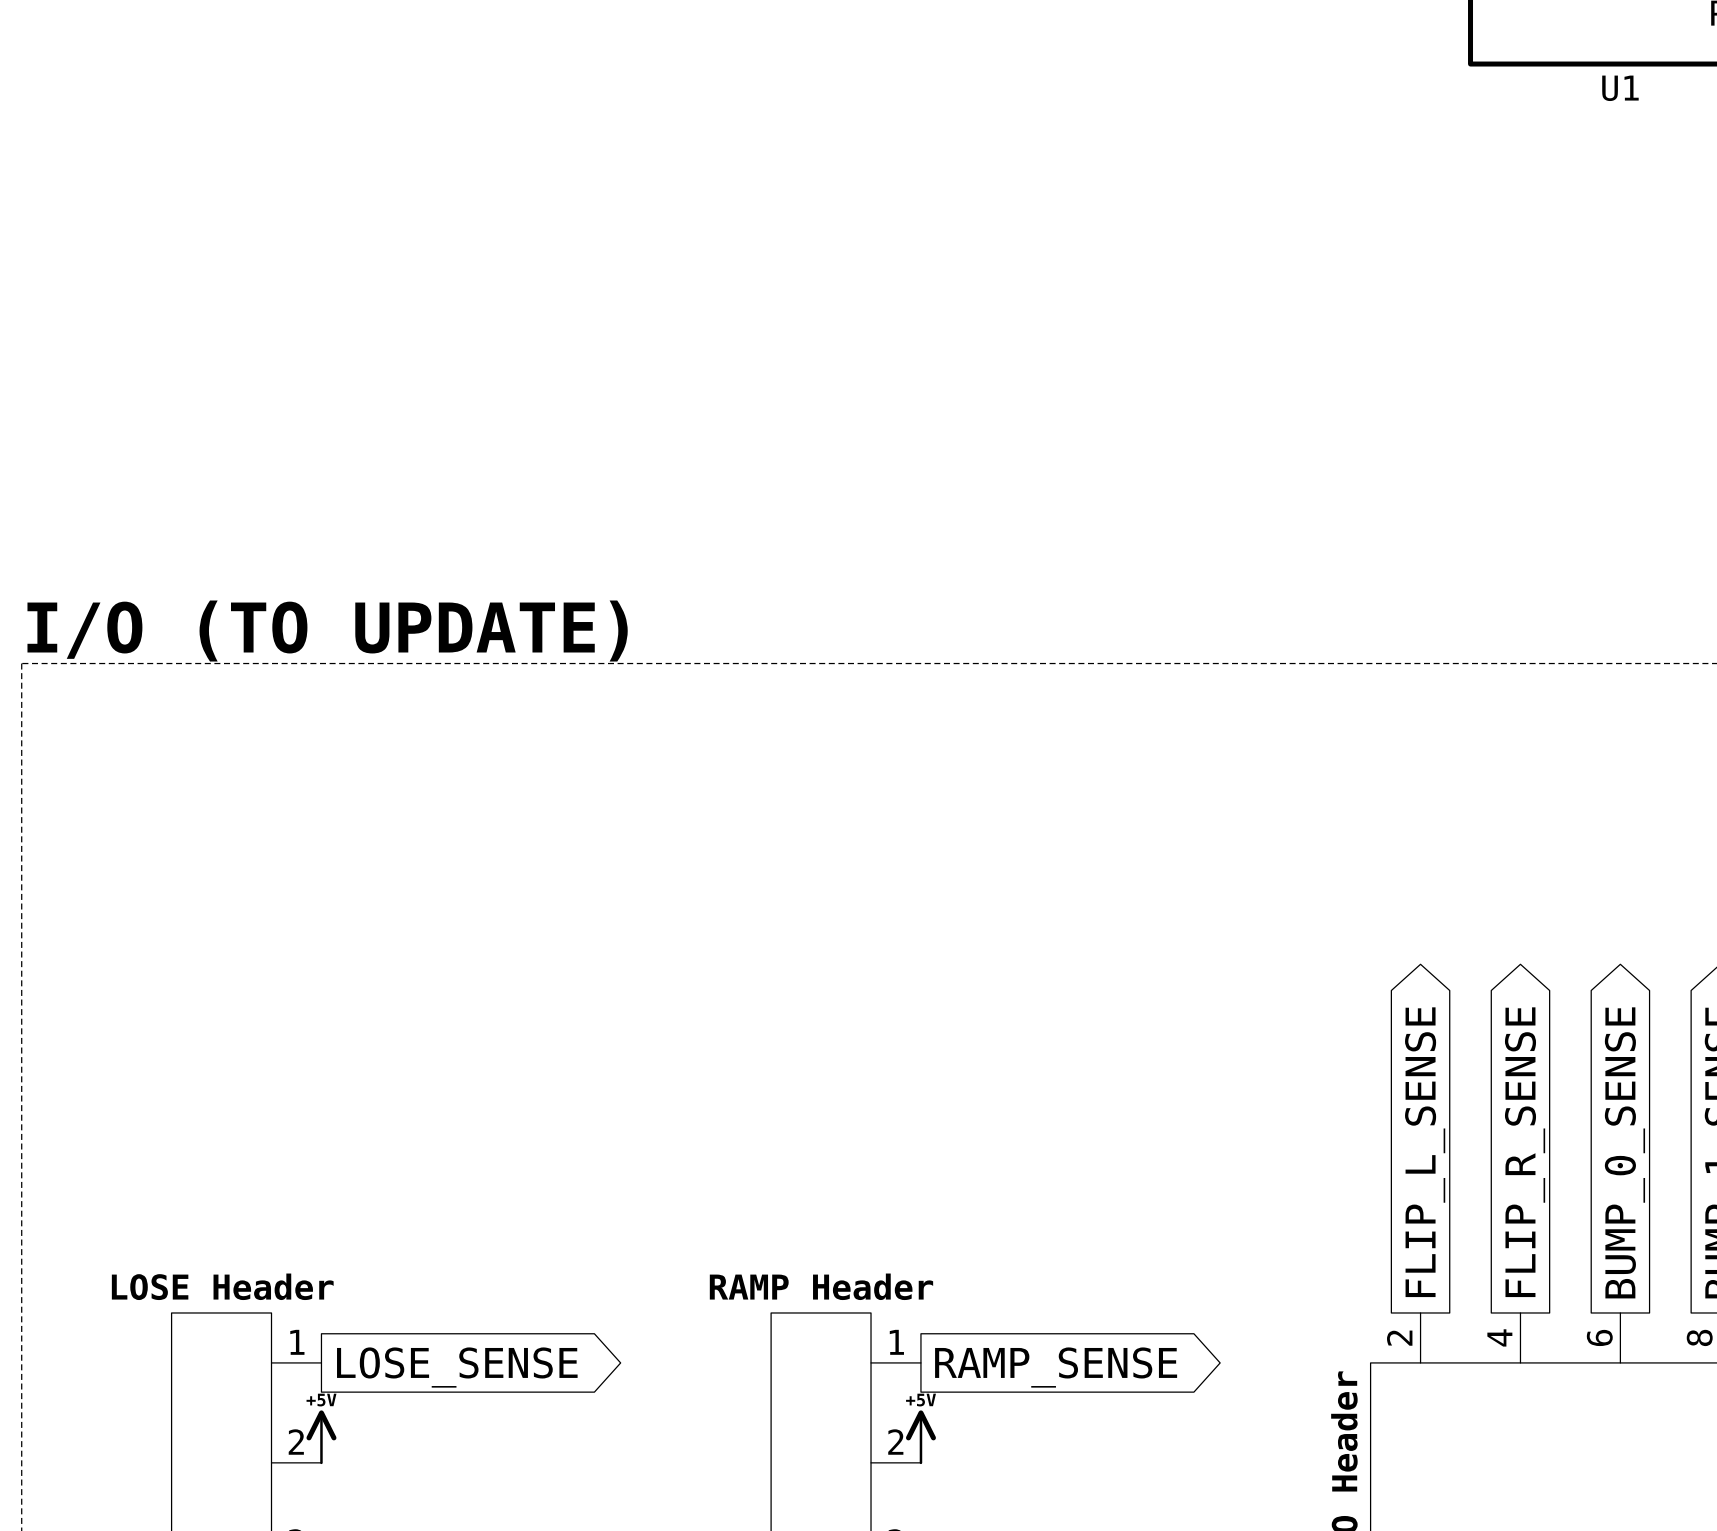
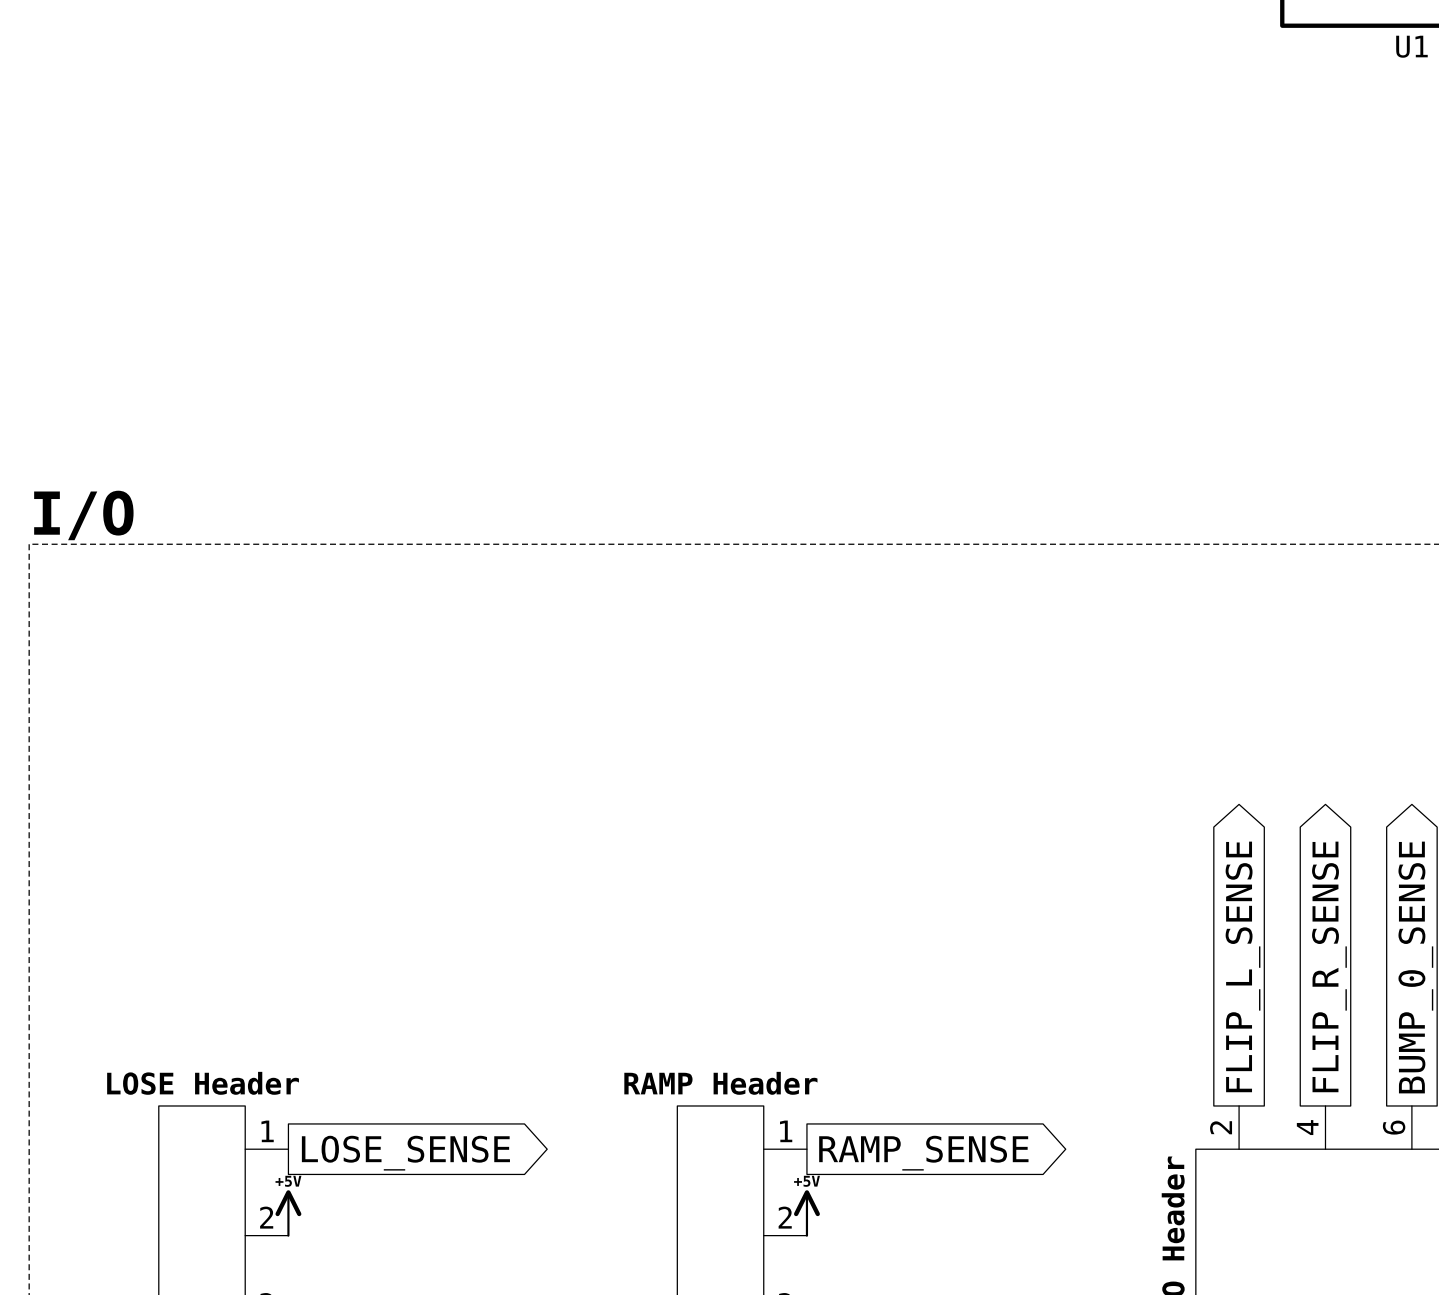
text: I/O (TO UPDATE) (327, 631) -> I/O (83, 515)

